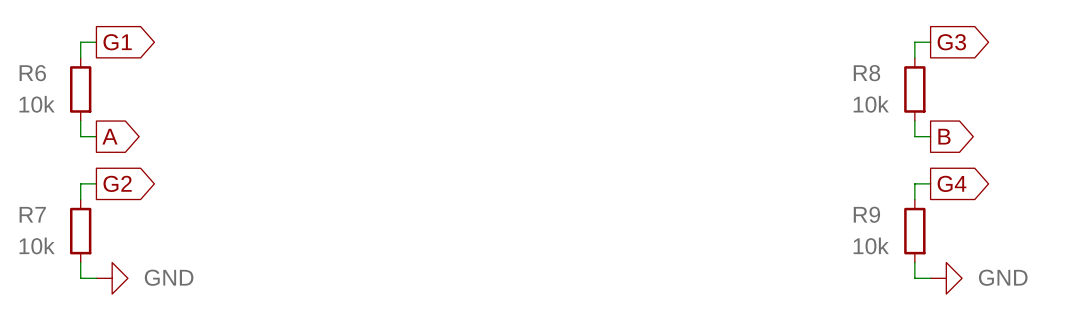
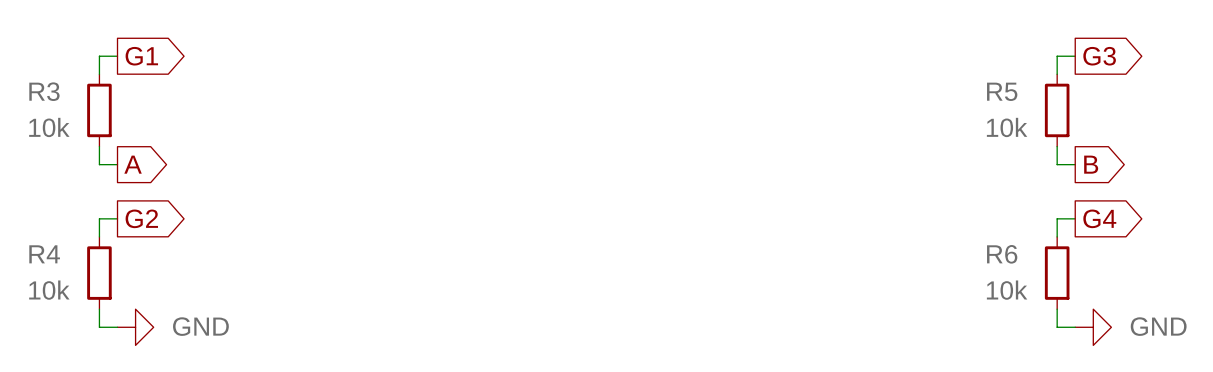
R6 name: R6 (32, 73) -> R3 (44, 91)
R8 name: R8 (866, 73) -> R5 (1002, 91)
R7 name: R7 (32, 214) -> R4 (44, 254)
R9 name: R9 (866, 214) -> R6 (1002, 254)

